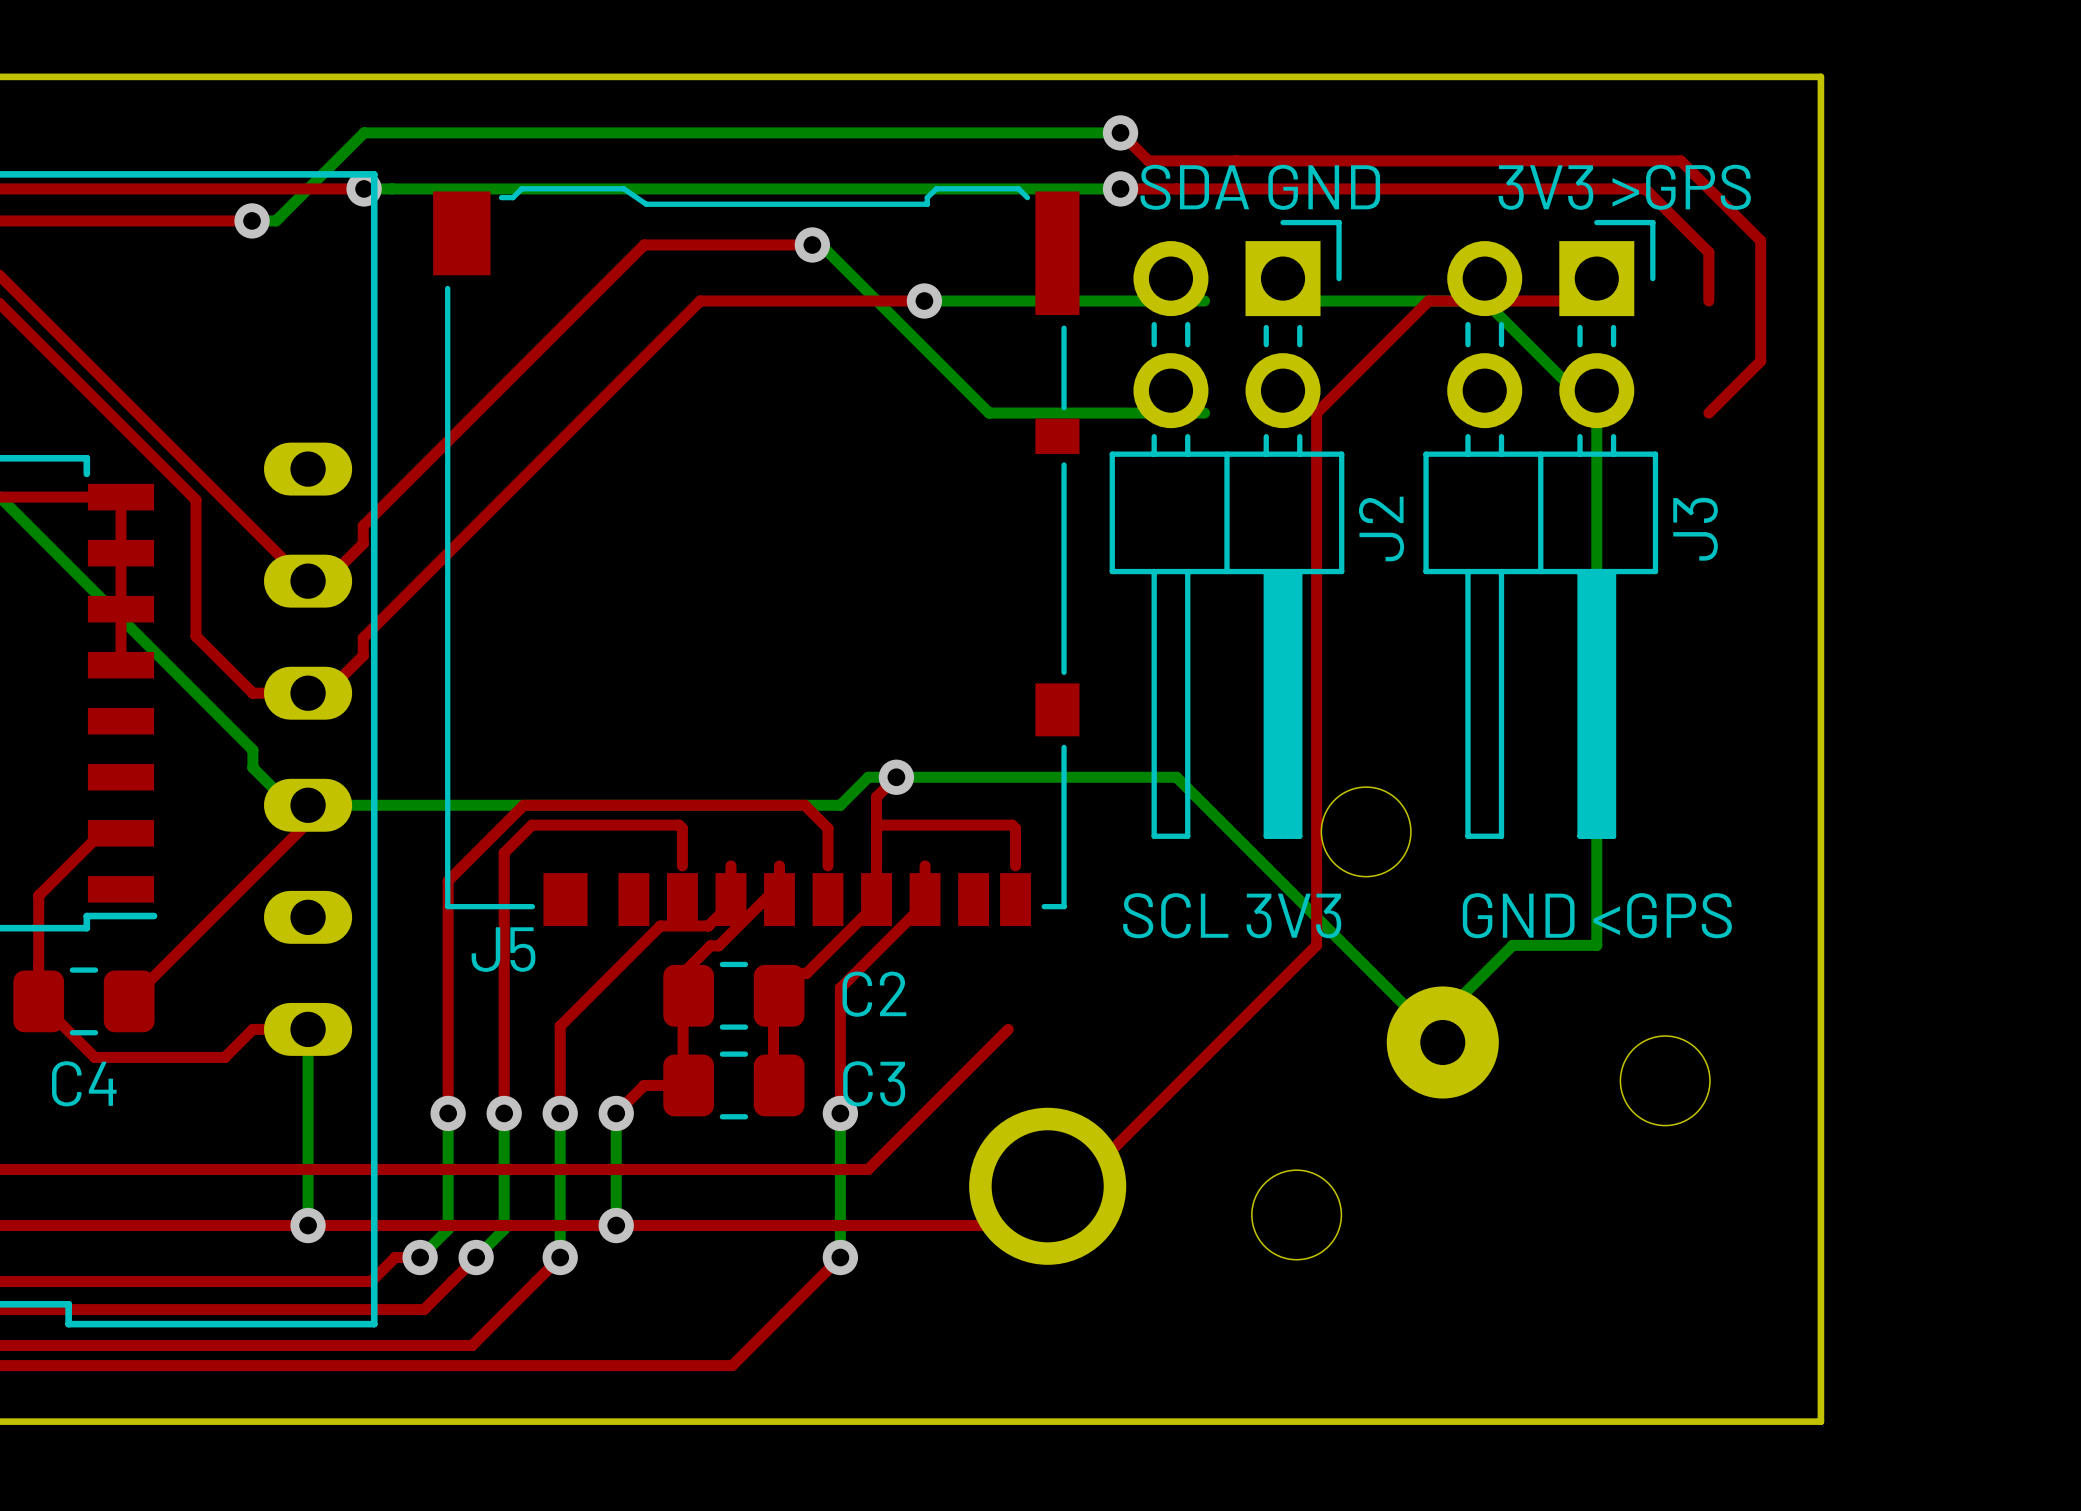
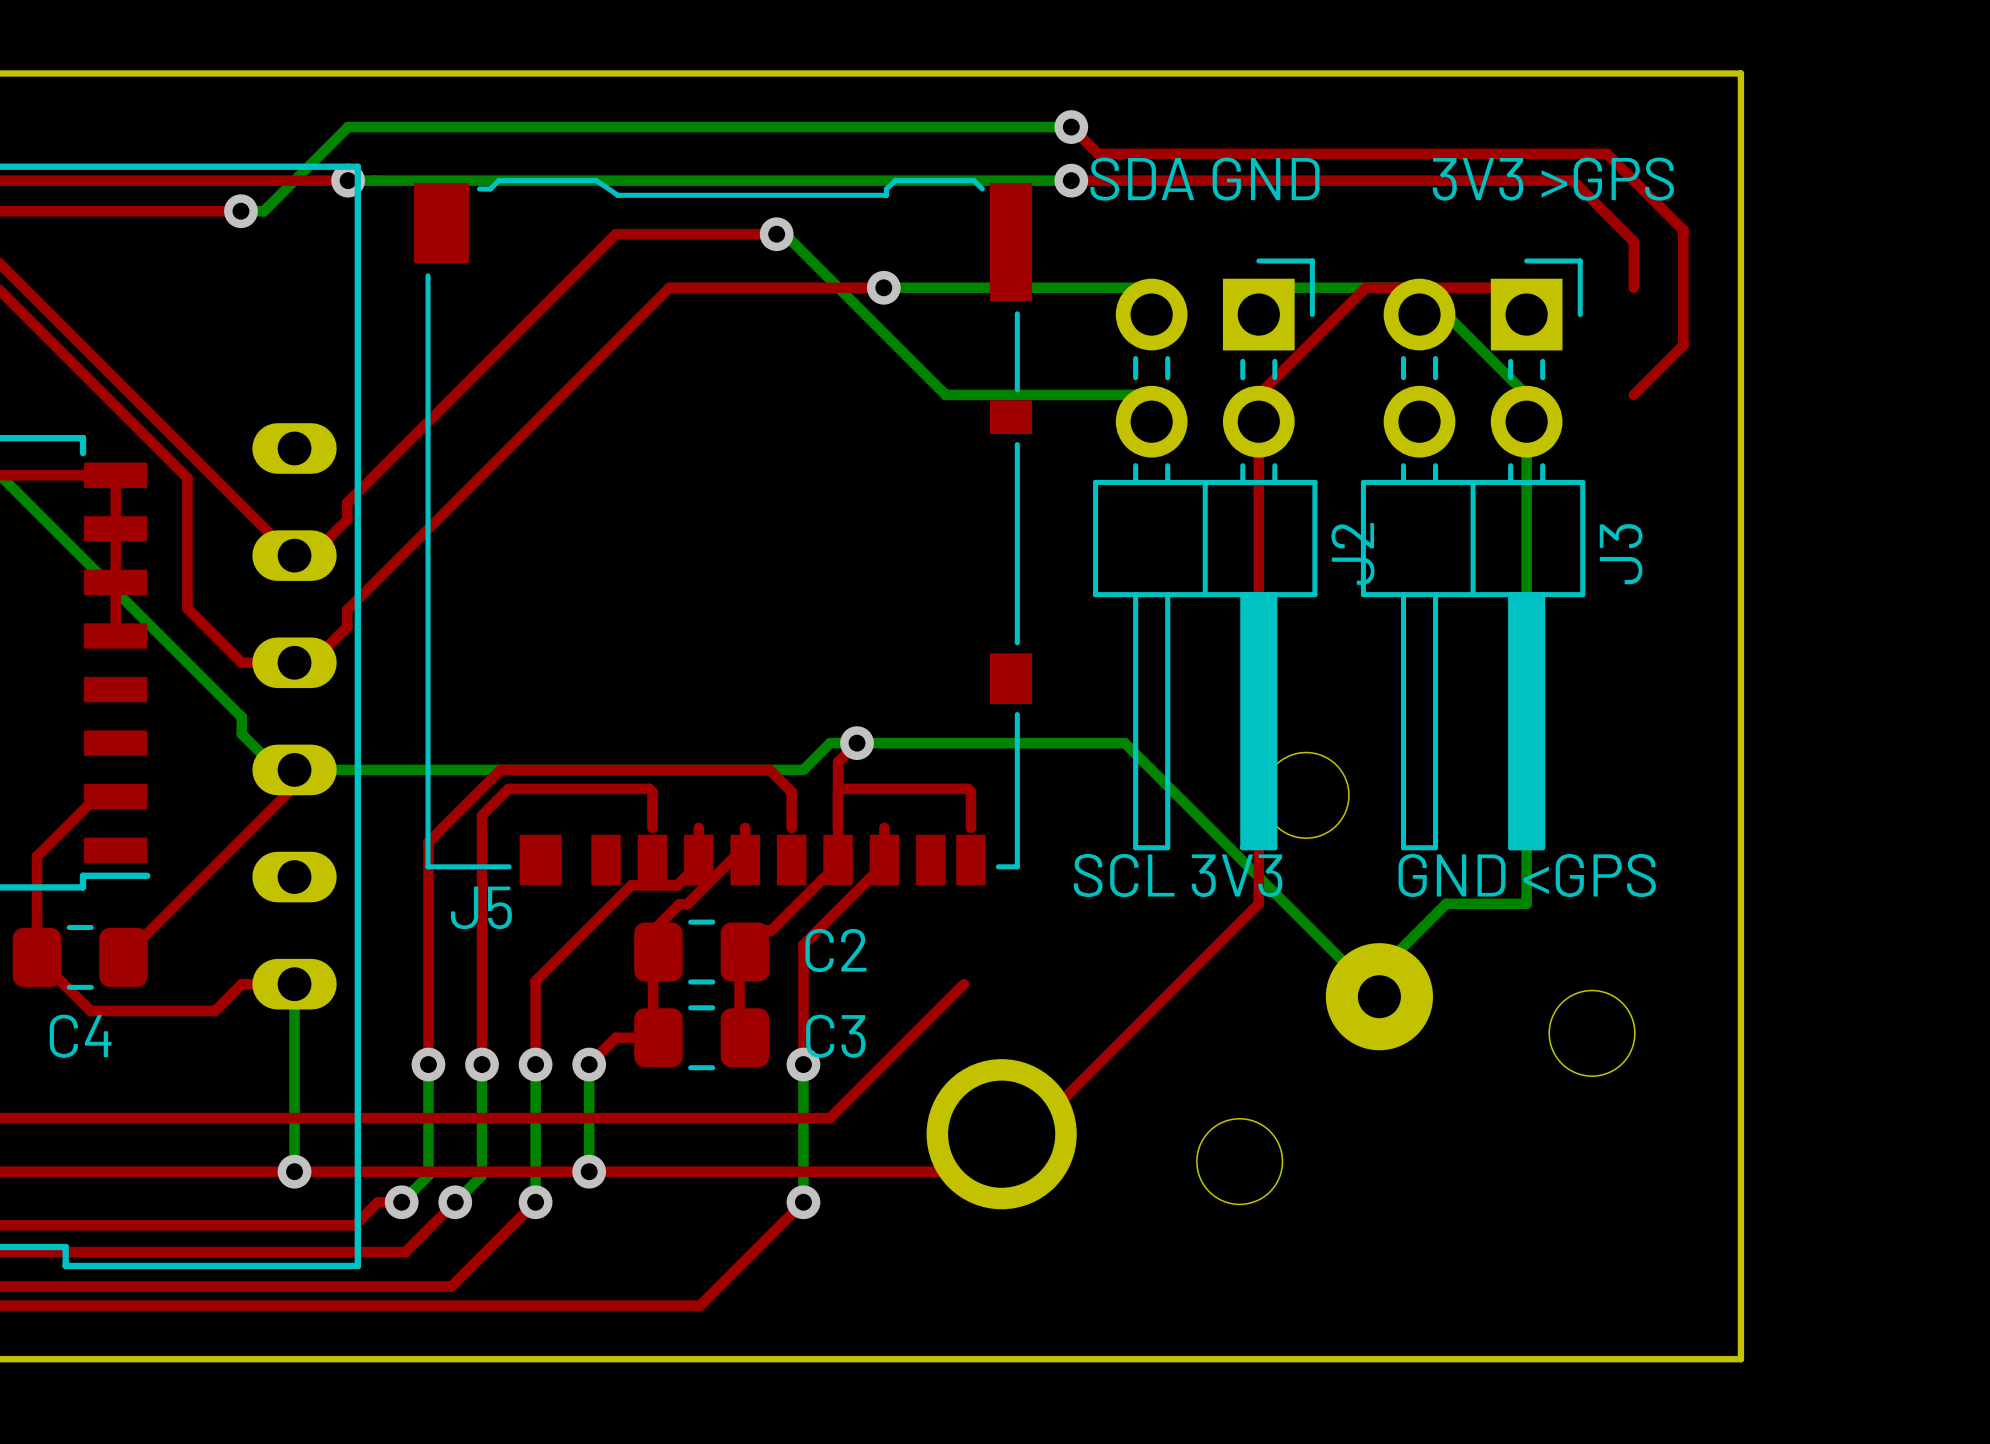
J2 position: (1226, 529) -> (1205, 554)
J3 position: (1540, 529) -> (1473, 554)

